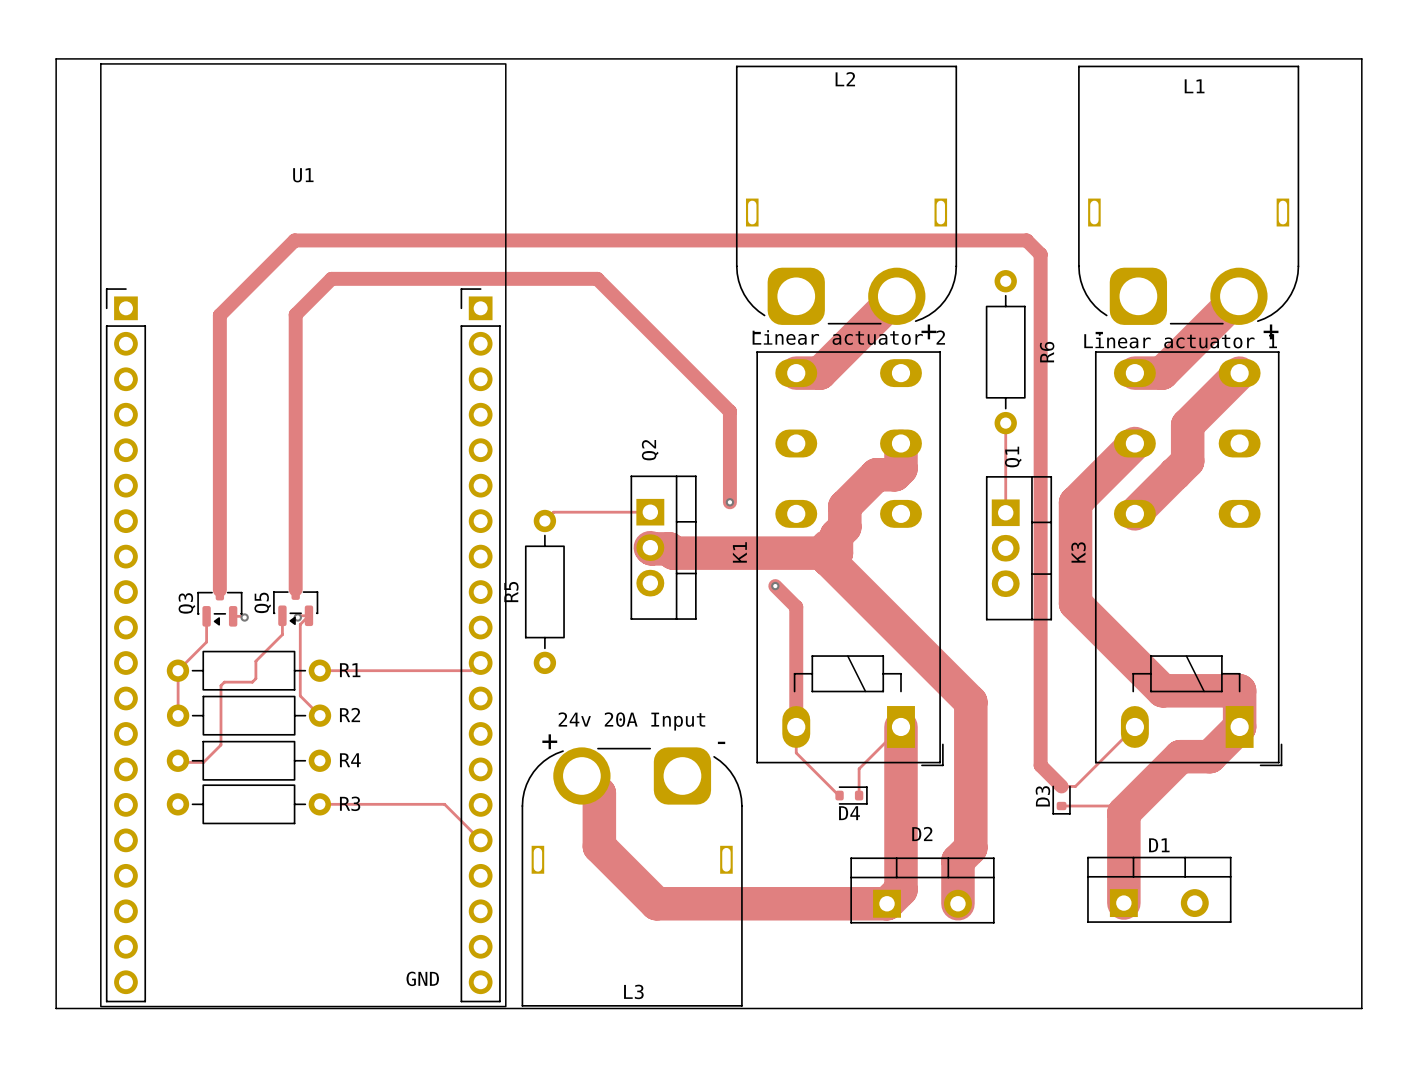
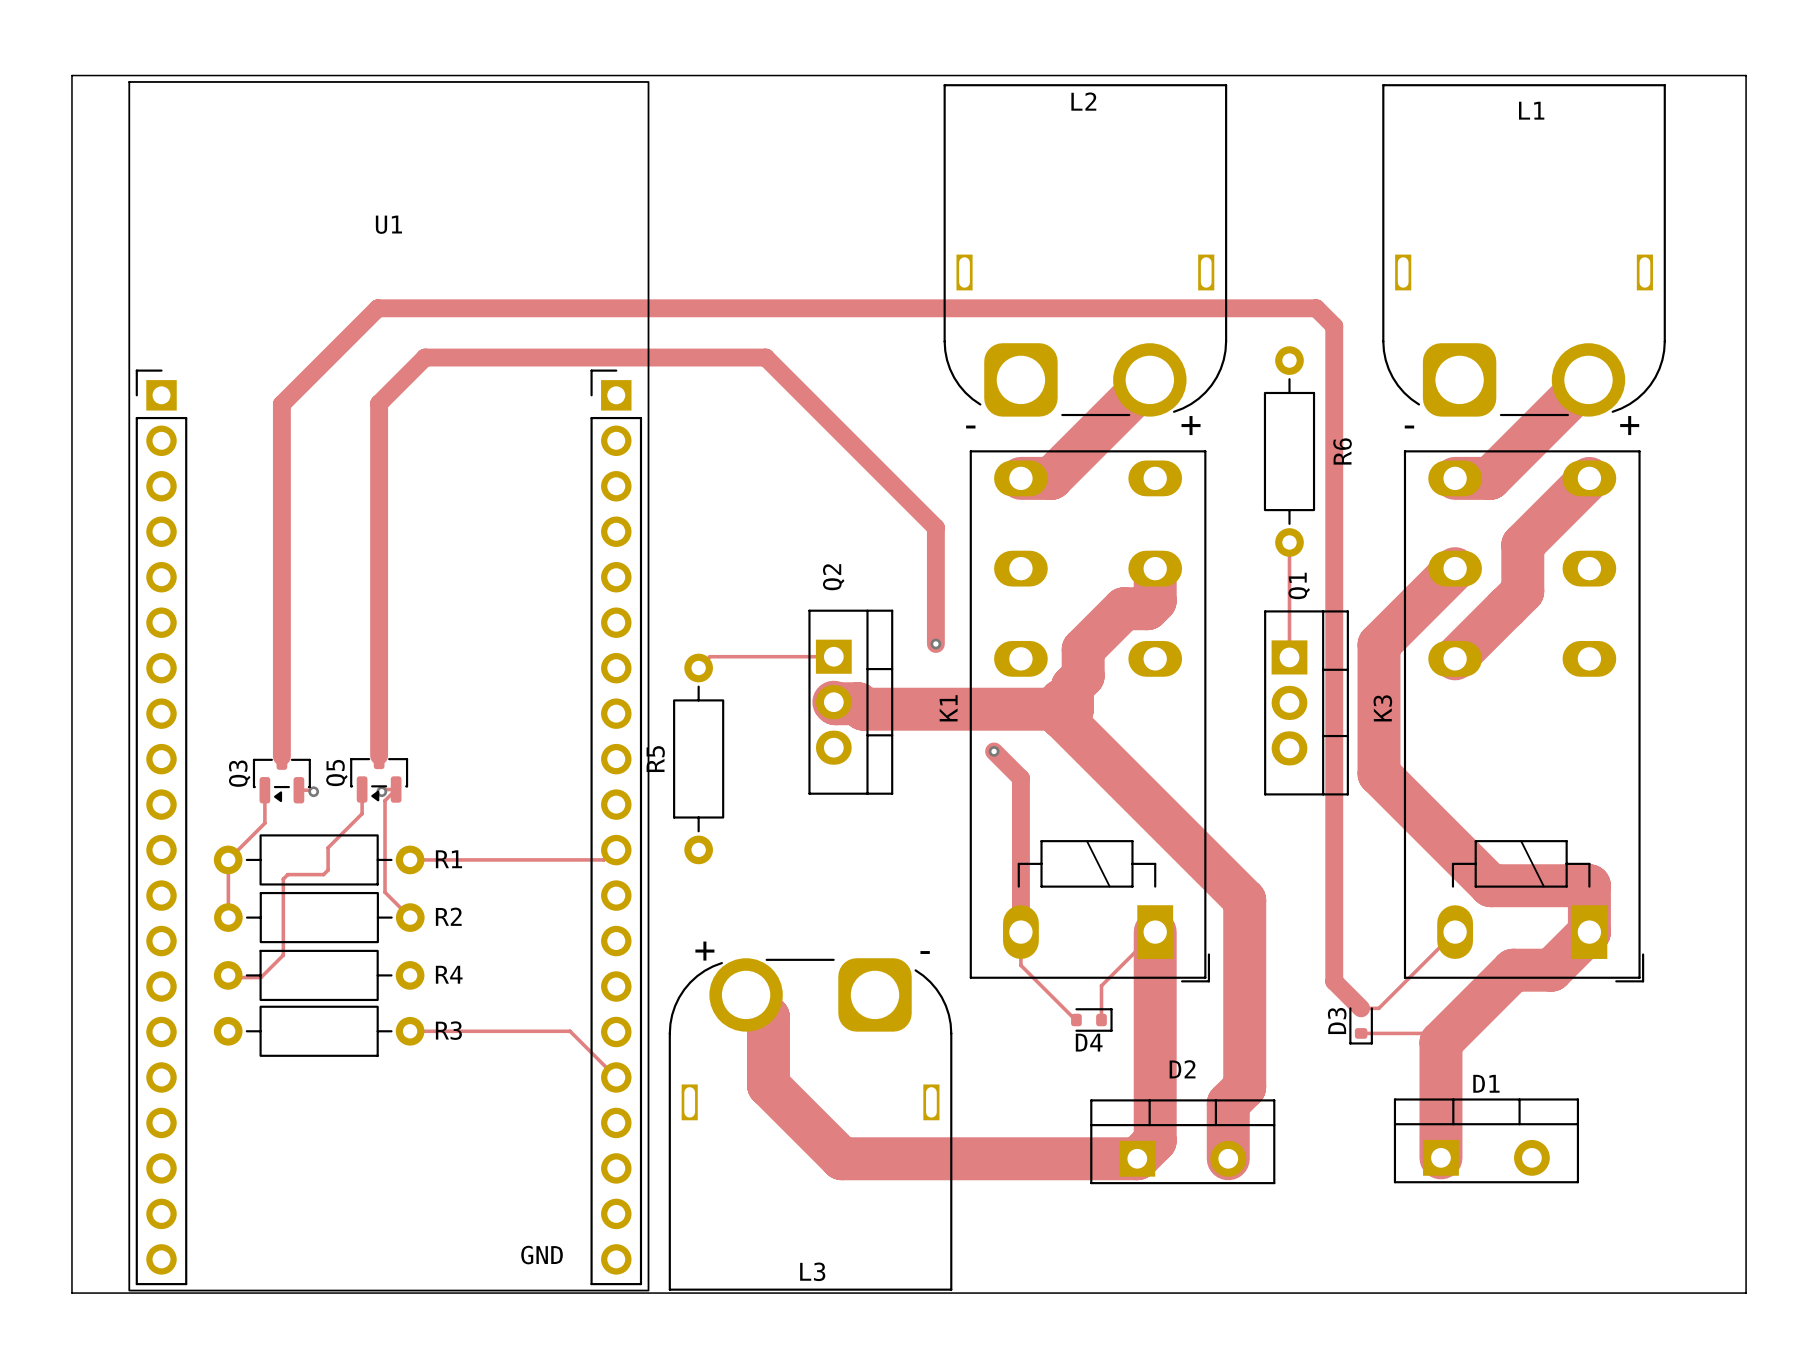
L2 value: Linear actuator 2 (848, 337) -> none
L1 value: Linear actuator 1 (1180, 341) -> none
L3 value: 24v 20A Input (631, 721) -> none

